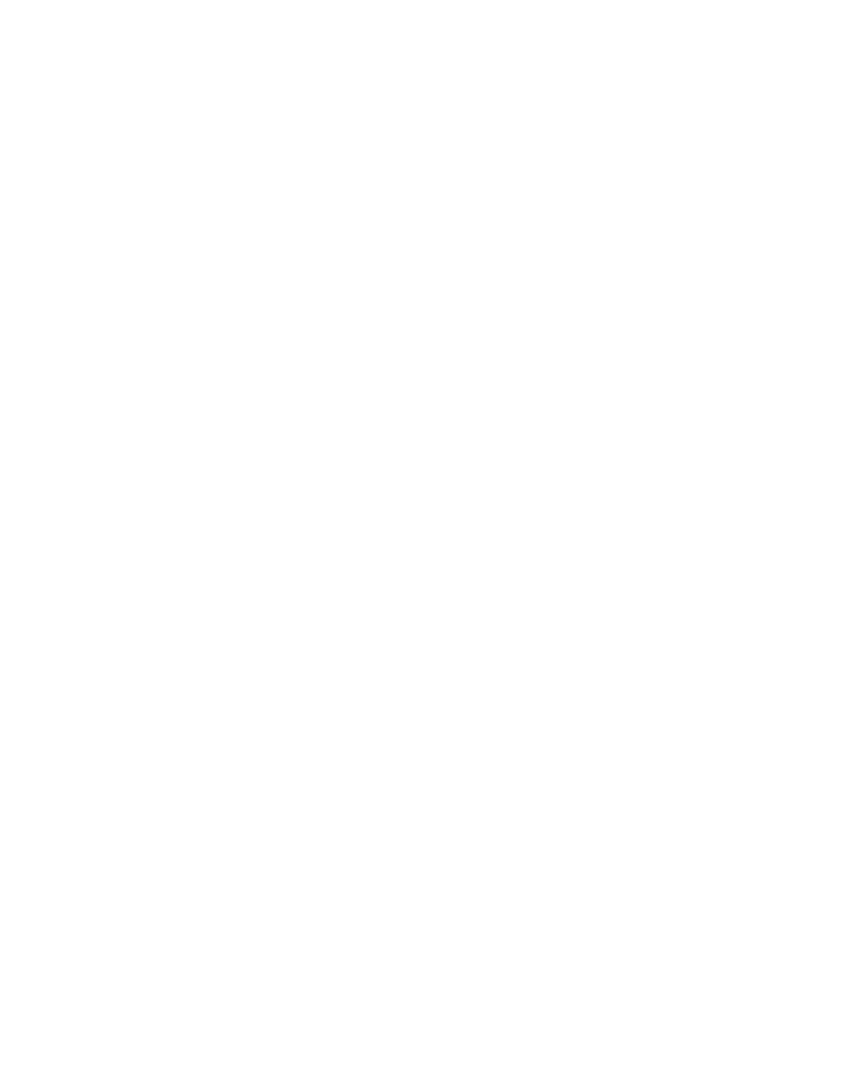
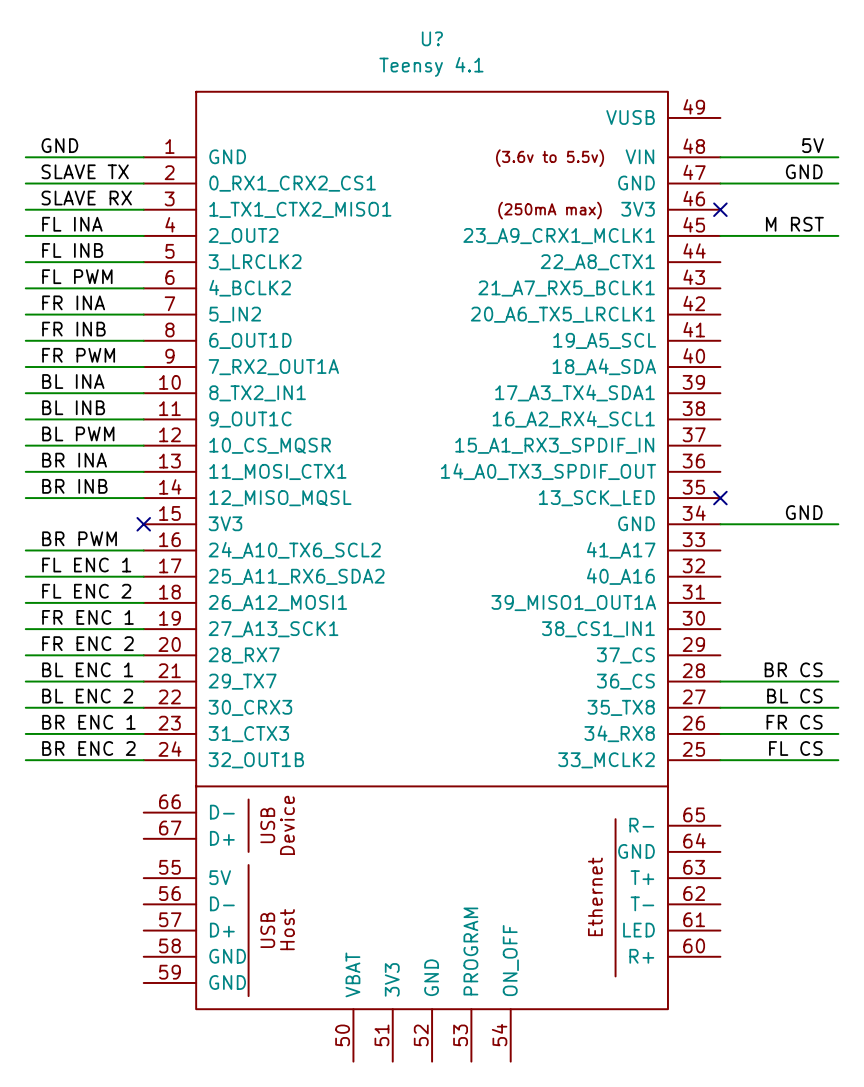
label: none -> GND (59, 145)
label: none -> 5V (812, 145)
wire: none -> (25, 157) (143, 157)
wire: none -> (720, 157) (838, 157)
label: none -> SLAVE TX (85, 171)
label: none -> GND (804, 171)
wire: none -> (25, 183) (143, 183)
wire: none -> (720, 183) (838, 183)
label: none -> SLAVE RX (86, 198)
wire: none -> (25, 209) (143, 209)
no-connect mark: none -> (720, 209)
label: none -> FL INA (72, 224)
label: none -> M RST (794, 224)
wire: none -> (25, 235) (143, 235)
wire: none -> (720, 235) (838, 235)
label: none -> FL INB (72, 250)
wire: none -> (25, 262) (143, 262)
label: none -> FL PWM (77, 276)
wire: none -> (25, 288) (143, 288)
label: none -> FR INA (73, 302)
wire: none -> (25, 314) (143, 314)
label: none -> FR INB (73, 329)
wire: none -> (25, 340) (143, 340)
label: none -> FR PWM (78, 355)
wire: none -> (25, 367) (143, 367)
label: none -> BL INA (73, 381)
wire: none -> (25, 393) (143, 393)
label: none -> BL INB (73, 407)
wire: none -> (25, 419) (143, 419)
label: none -> BL PWM (78, 433)
wire: none -> (25, 445) (143, 445)
label: none -> BR INA (74, 460)
wire: none -> (25, 471) (143, 471)
label: none -> BR INB (74, 486)
wire: none -> (25, 498) (143, 498)
no-connect mark: none -> (720, 498)
label: none -> GND (804, 512)
no-connect mark: none -> (143, 524)
wire: none -> (720, 524) (838, 524)
label: none -> BR PWM (79, 538)
wire: none -> (25, 550) (143, 550)
label: none -> FL ENC 1 (86, 565)
wire: none -> (25, 576) (143, 576)
U?: none -> Teensy 4.1 (432, 576)
label: none -> FL ENC 2 (86, 591)
wire: none -> (25, 602) (143, 602)
label: none -> FR ENC 1 (87, 617)
wire: none -> (25, 629) (143, 629)
label: none -> FR ENC 2 (87, 643)
wire: none -> (25, 655) (143, 655)
label: none -> BL ENC 1 (87, 669)
label: none -> BR CS (793, 669)
wire: none -> (25, 681) (143, 681)
wire: none -> (720, 681) (838, 681)
label: none -> BL ENC 2 (87, 696)
label: none -> BL CS (794, 696)
wire: none -> (25, 707) (143, 707)
wire: none -> (720, 707) (838, 707)
label: none -> BR ENC 1 (88, 722)
label: none -> FR CS (794, 722)
wire: none -> (25, 733) (143, 733)
wire: none -> (720, 733) (838, 733)
label: none -> BR ENC 2 (88, 748)
label: none -> FL CS (795, 748)
wire: none -> (25, 760) (143, 760)
wire: none -> (720, 760) (838, 760)

